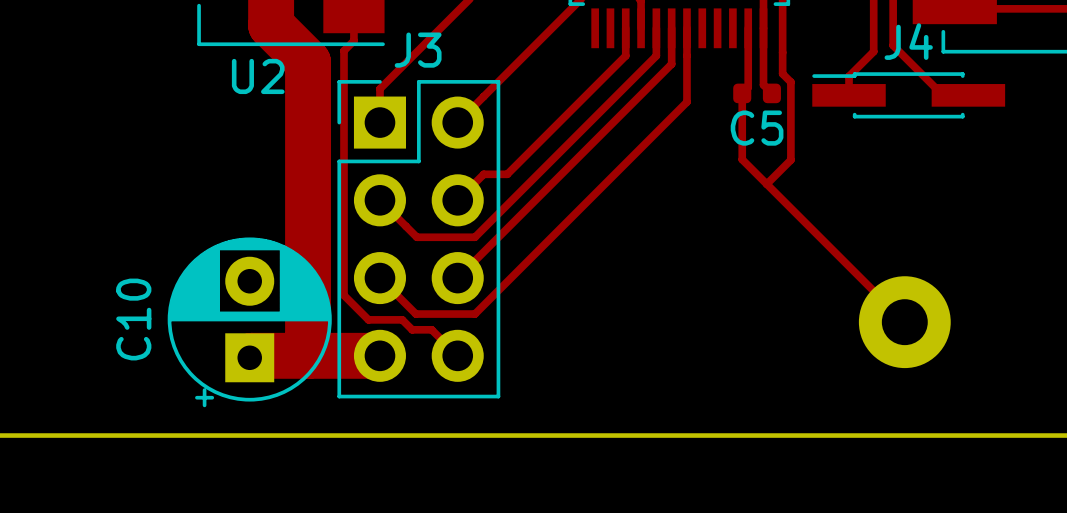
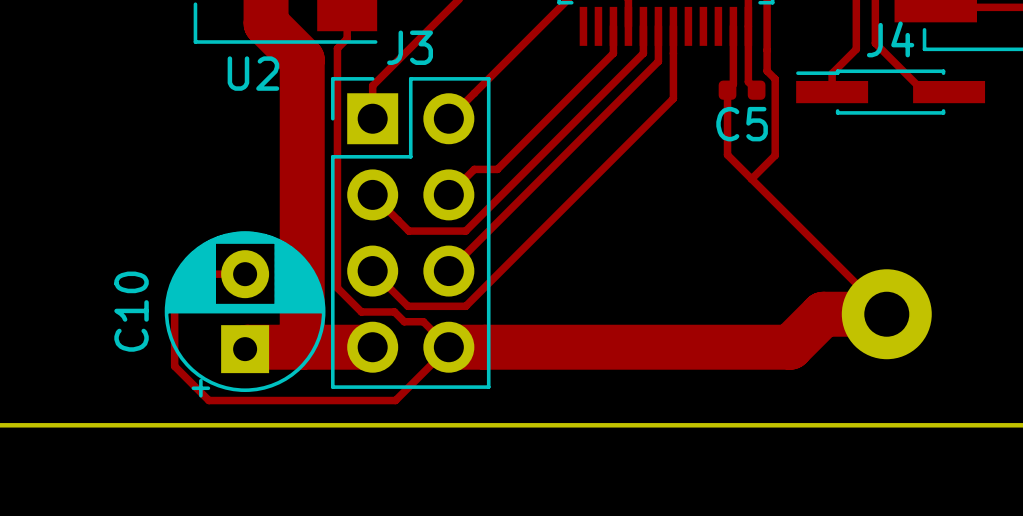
top track: none -> (245, 274) (194, 274) (174, 293) (174, 366) (208, 400) (395, 400) (448, 347) (790, 347) (823, 314) (886, 314)

